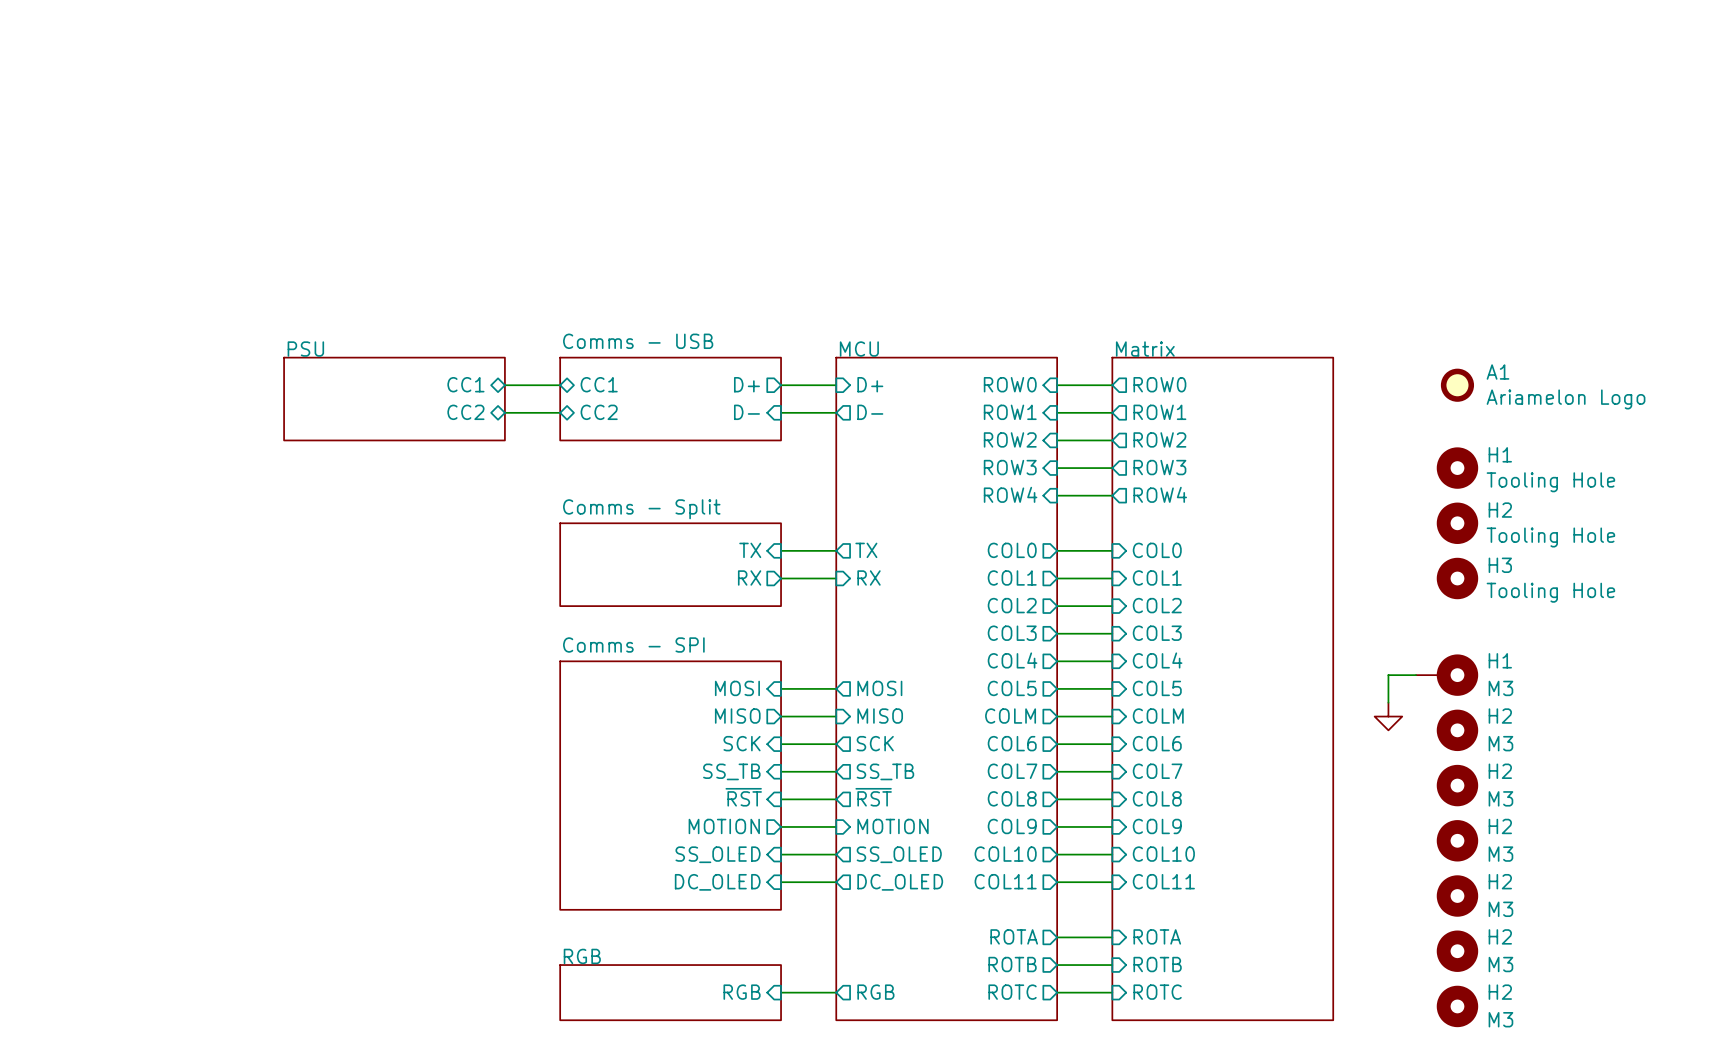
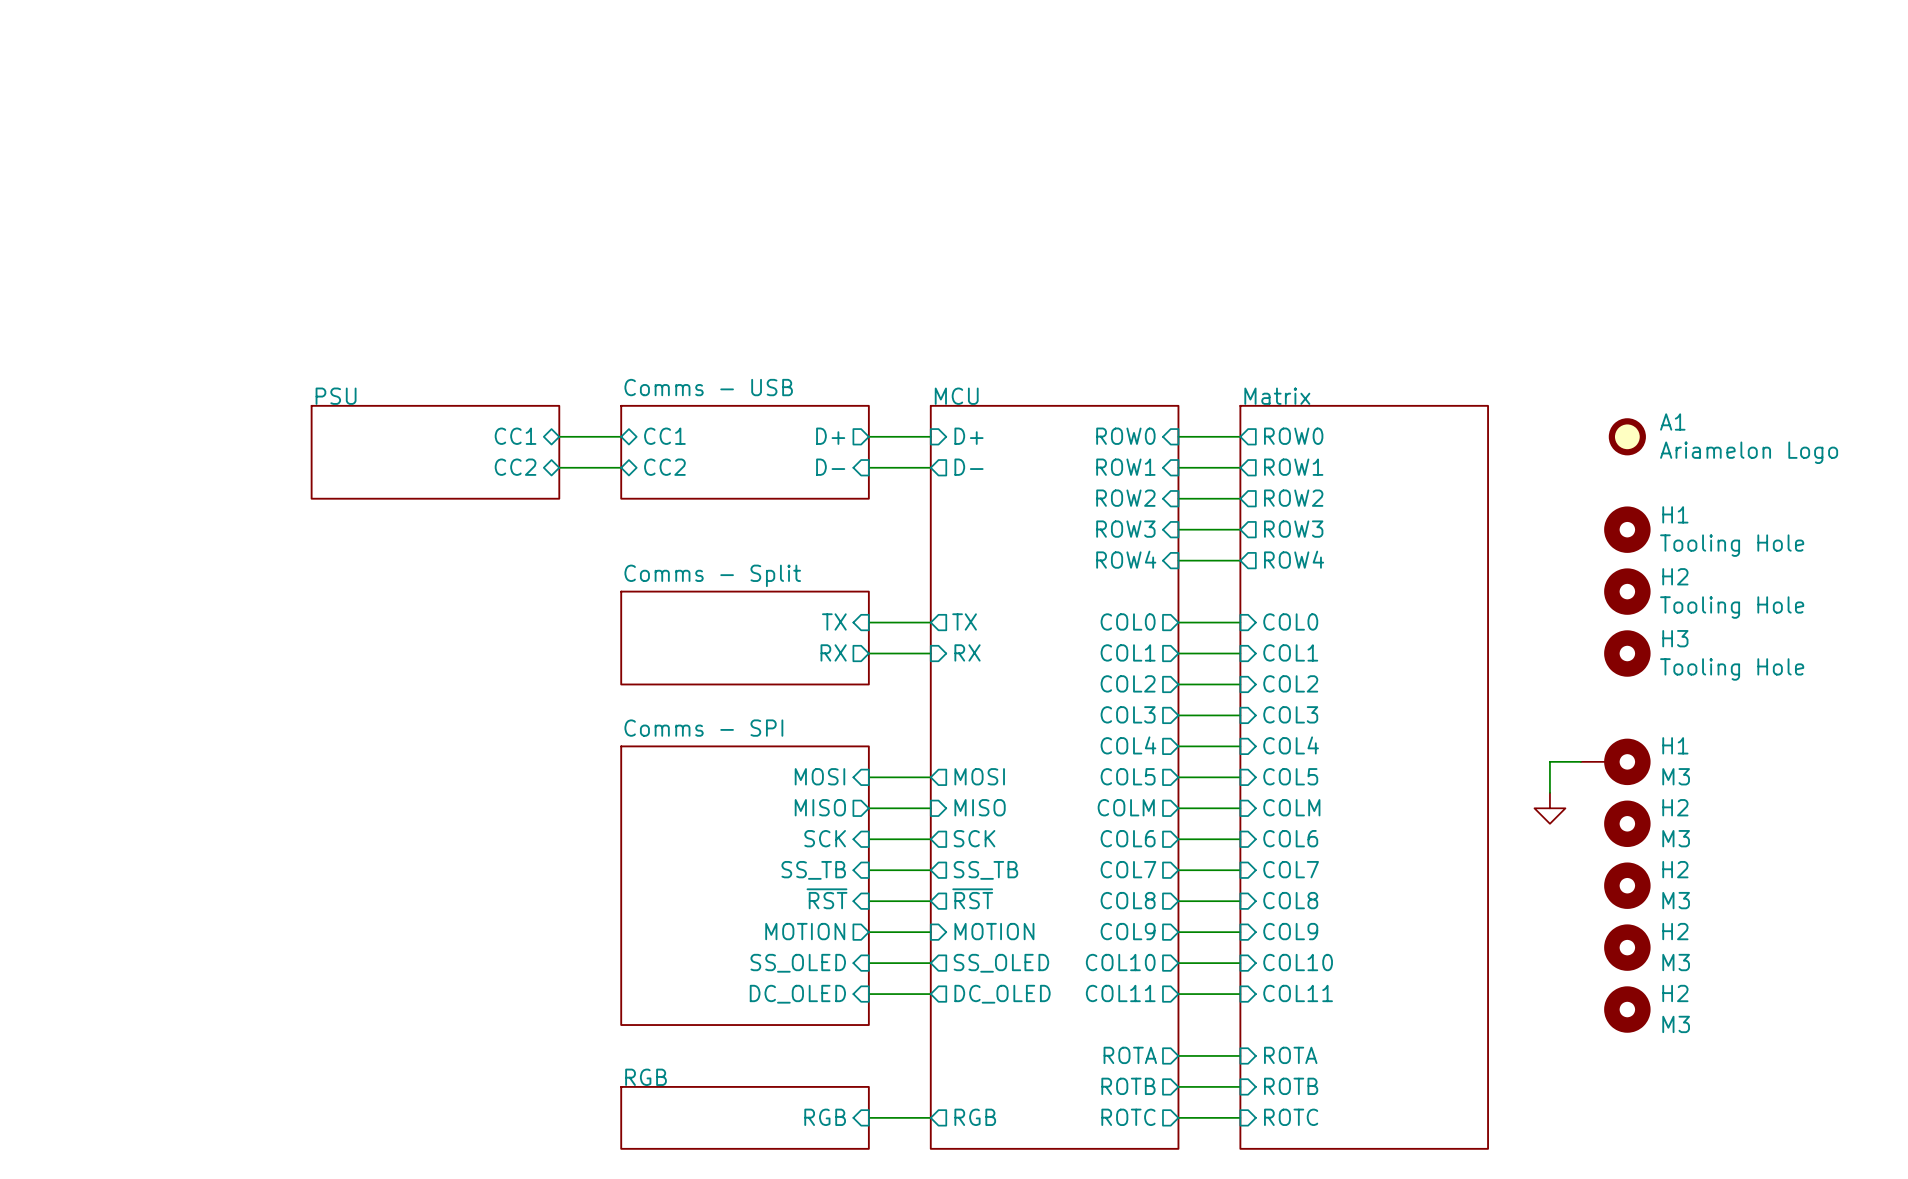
H2: M3 (1457, 951) -> none
H2: M3 (1457, 1006) -> none

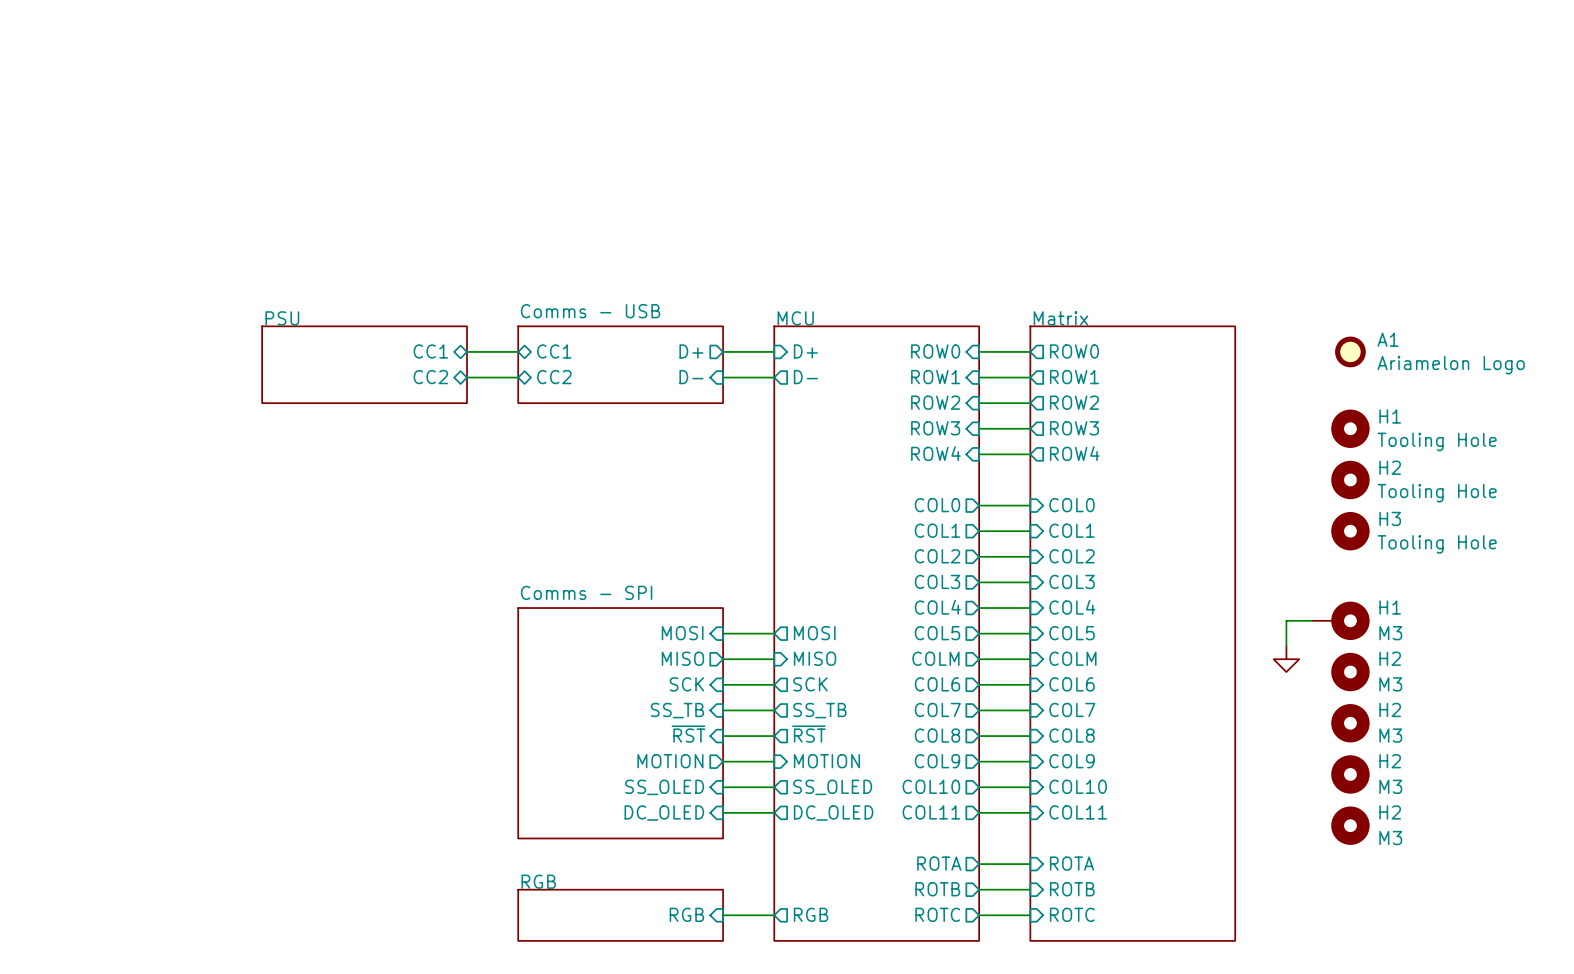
sheet pin: TX (834, 621) -> none
sheet pin: TX (964, 621) -> none
wire: (868, 622) (930, 622) -> none
sheet Comms - Split: (745, 638) -> none
sheet pin: RX (833, 652) -> none
sheet pin: RX (967, 652) -> none
wire: (868, 653) (930, 653) -> none

